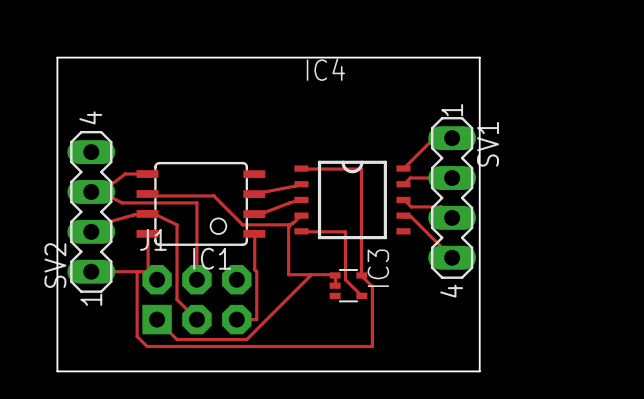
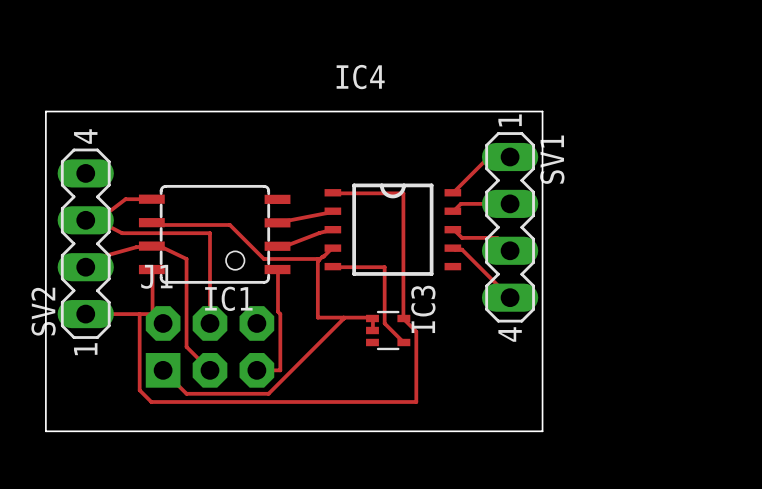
board edge: (57, 99) (57, 57) (479, 57) (479, 99) -> (45, 111) (542, 111)

